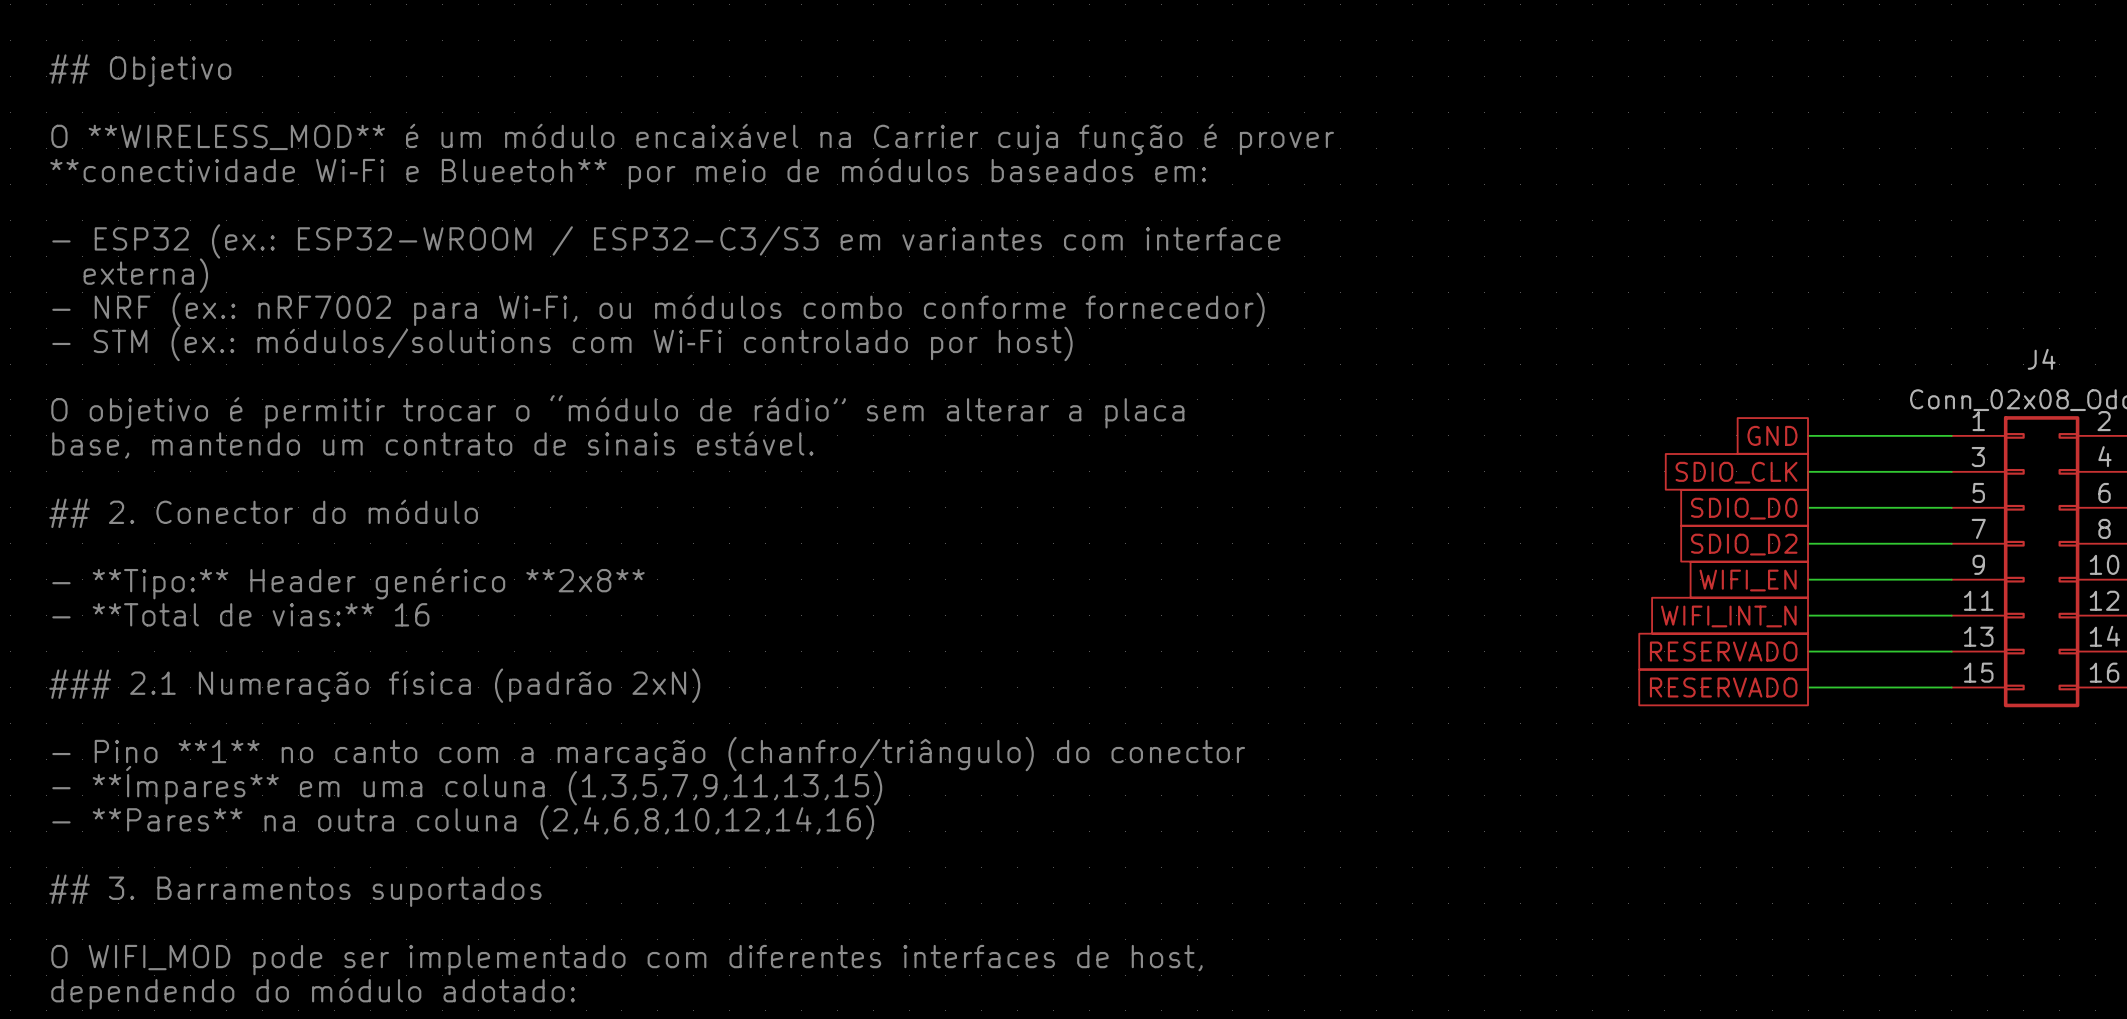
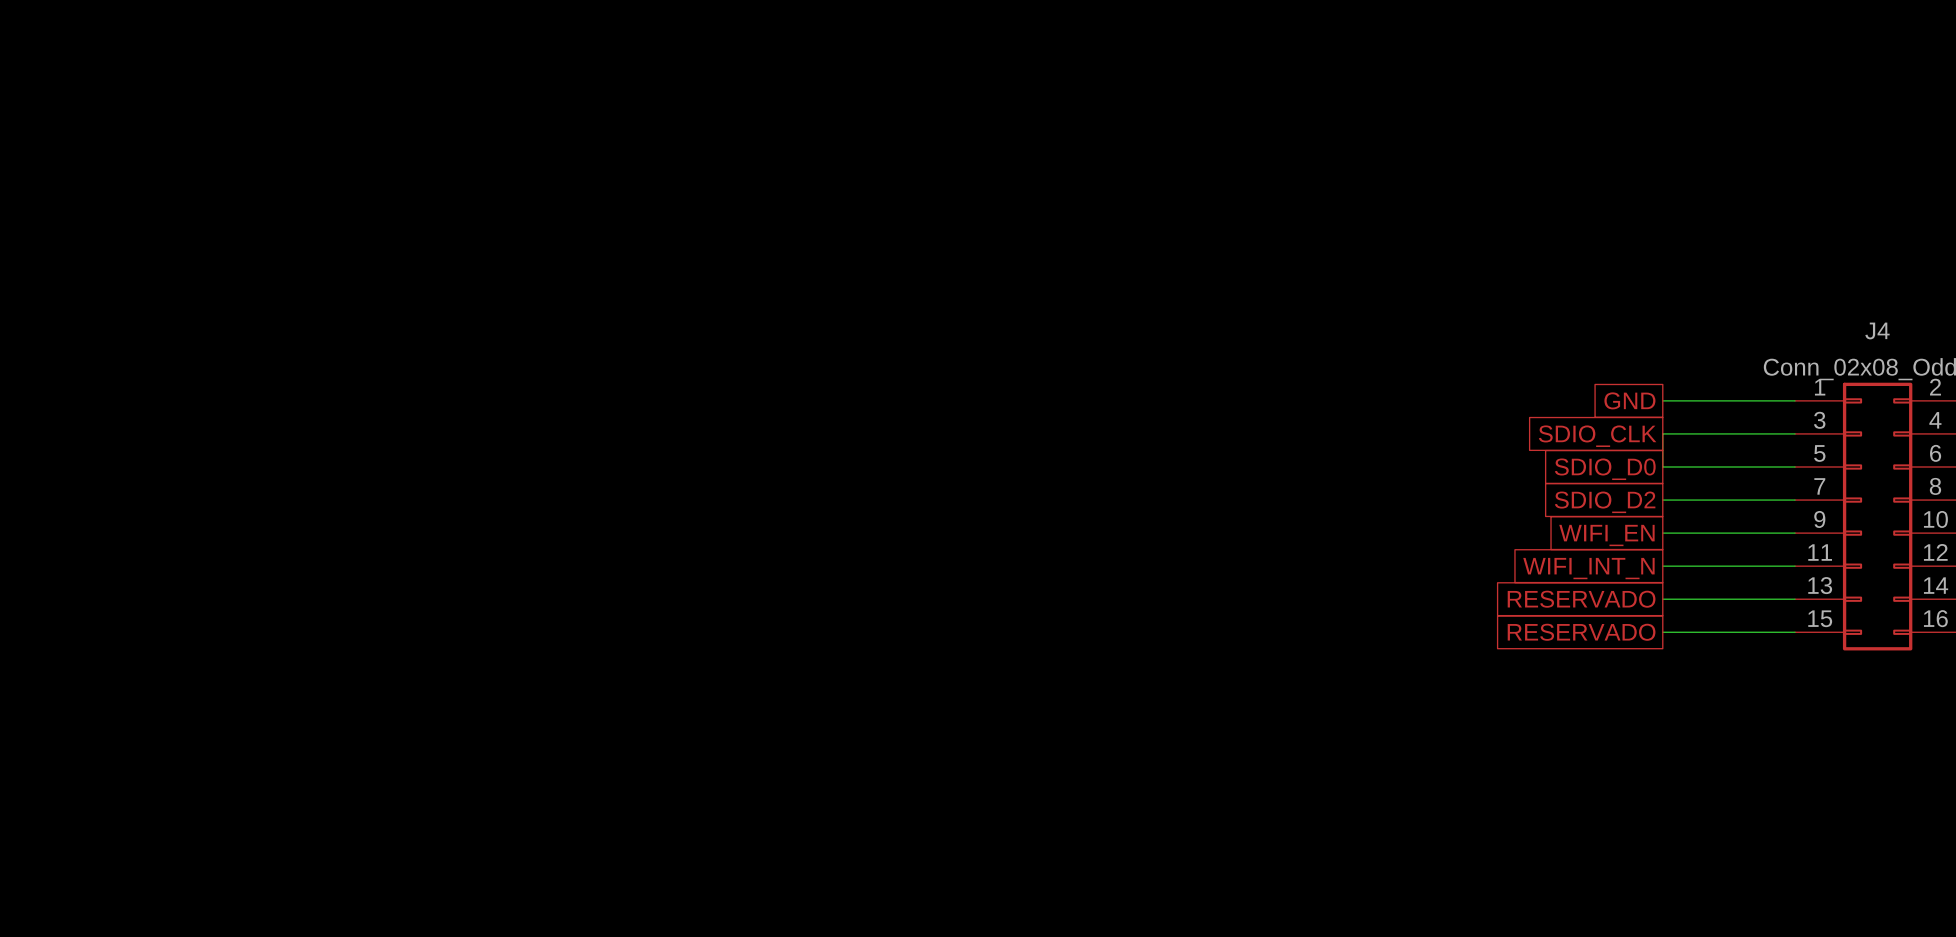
text: ## Objetivo (140, 70) -> none
text: O **WIRELESS_MOD** é um módulo encaixável na Carrier cuja função é prover (692, 139) -> none
text: **conectividade Wi‑Fi e Blueetoh** por meio de módulos baseados em: (628, 173) -> none
text: - ESP32 (ex.: ESP32-WROOM / ESP32-C3/S3 em variantes com interface (666, 241) -> none
text: externa) (145, 275) -> none
text: - NRF (ex.: nRF7002 para Wi‑Fi, ou módulos combo conforme fornecedor) (658, 309) -> none
text: - STM (ex.: módulos/solutions com Wi‑Fi controlado por host) (562, 343) -> none
text: O objetivo é permitir trocar o “módulo de rádio” sem alterar a placa (617, 411) -> none
text: base, mantendo um contrato de sinais estável. (432, 444) -> none
text: ## 2. Conector do módulo (263, 513) -> none
text: - **Tipo:** Header genérico **2x8** (348, 583) -> none
text: - **Total de vias:** 16 (240, 614) -> none
text: ### 2.1 Numeração física (padrão 2xN) (374, 685) -> none
text: - Pino **1** no canto com a marcação (chanfro/triângulo) do conector (648, 754) -> none
text: - **Ímpares** em uma coluna (1,3,5,7,9,11,13,15) (467, 785) -> none
text: - **Pares** na outra coluna (2,4,6,8,10,12,14,16) (463, 822) -> none
text: ## 3. Barramentos suportados (295, 890) -> none
text: O WIFI_MOD pode ser implementado com diferentes interfaces de host, (626, 960) -> none
text: dependendo do módulo adotado: (313, 993) -> none

